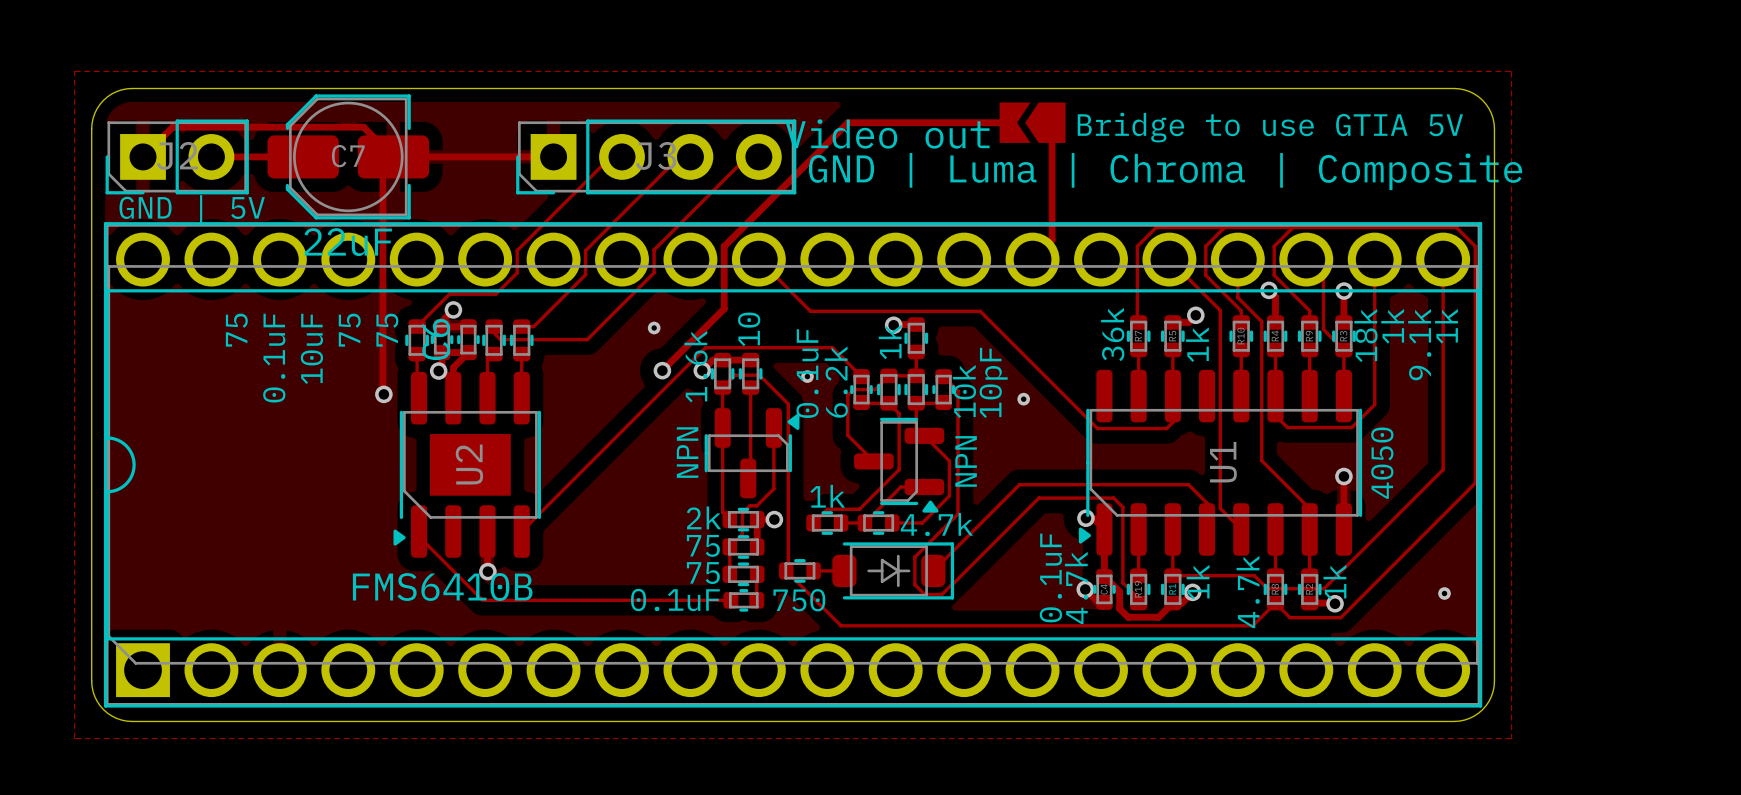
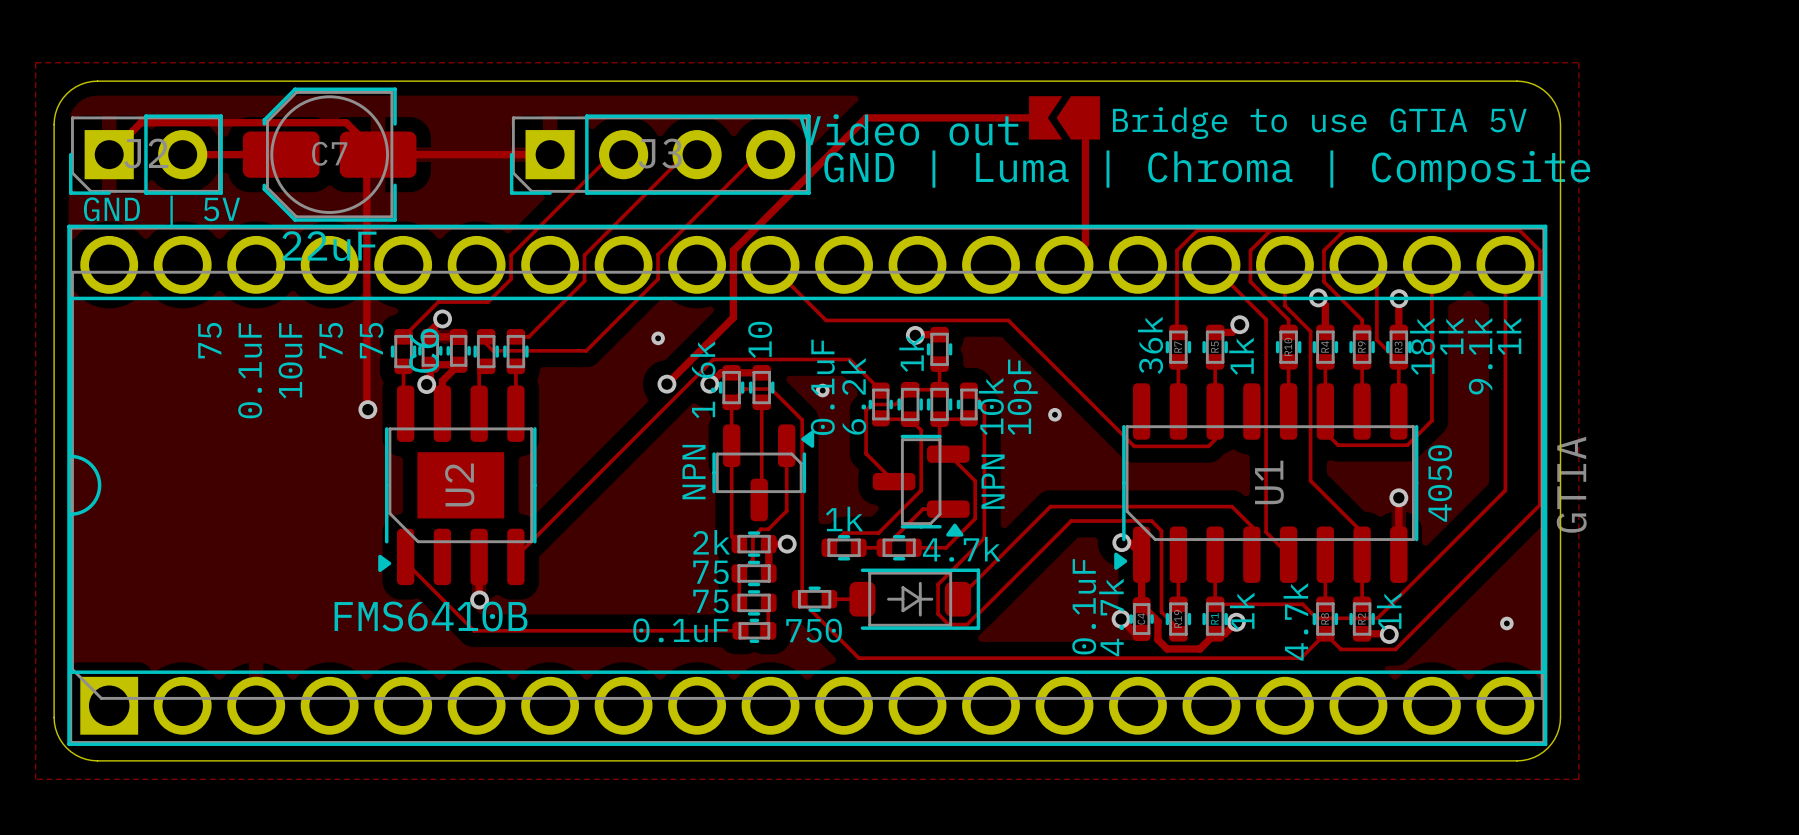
part value: none -> GTIA (1571, 484)

